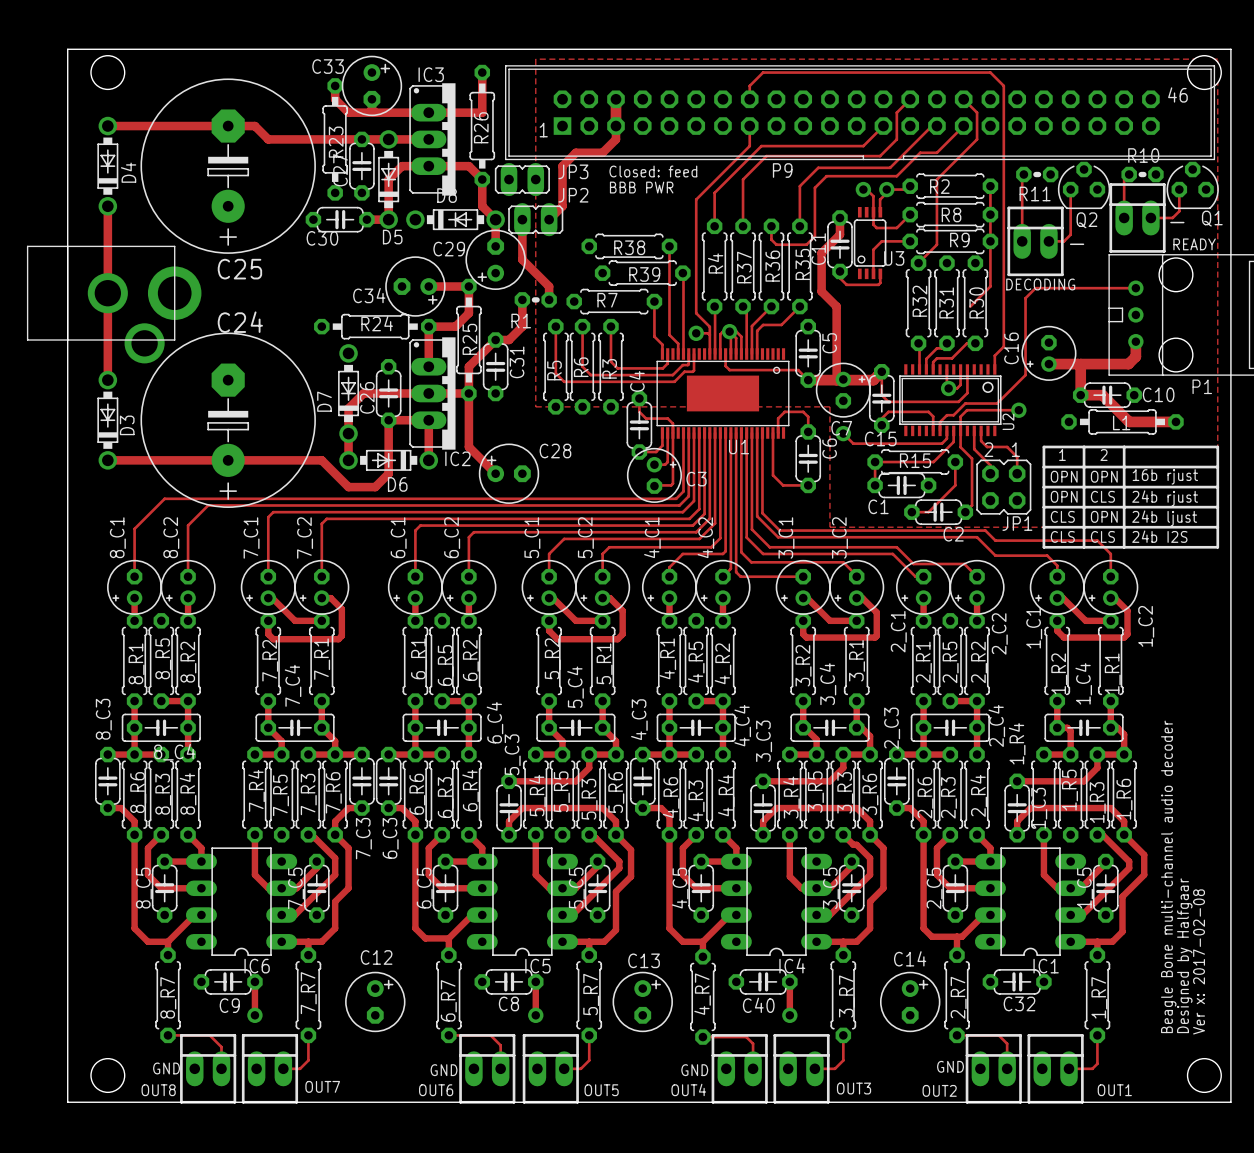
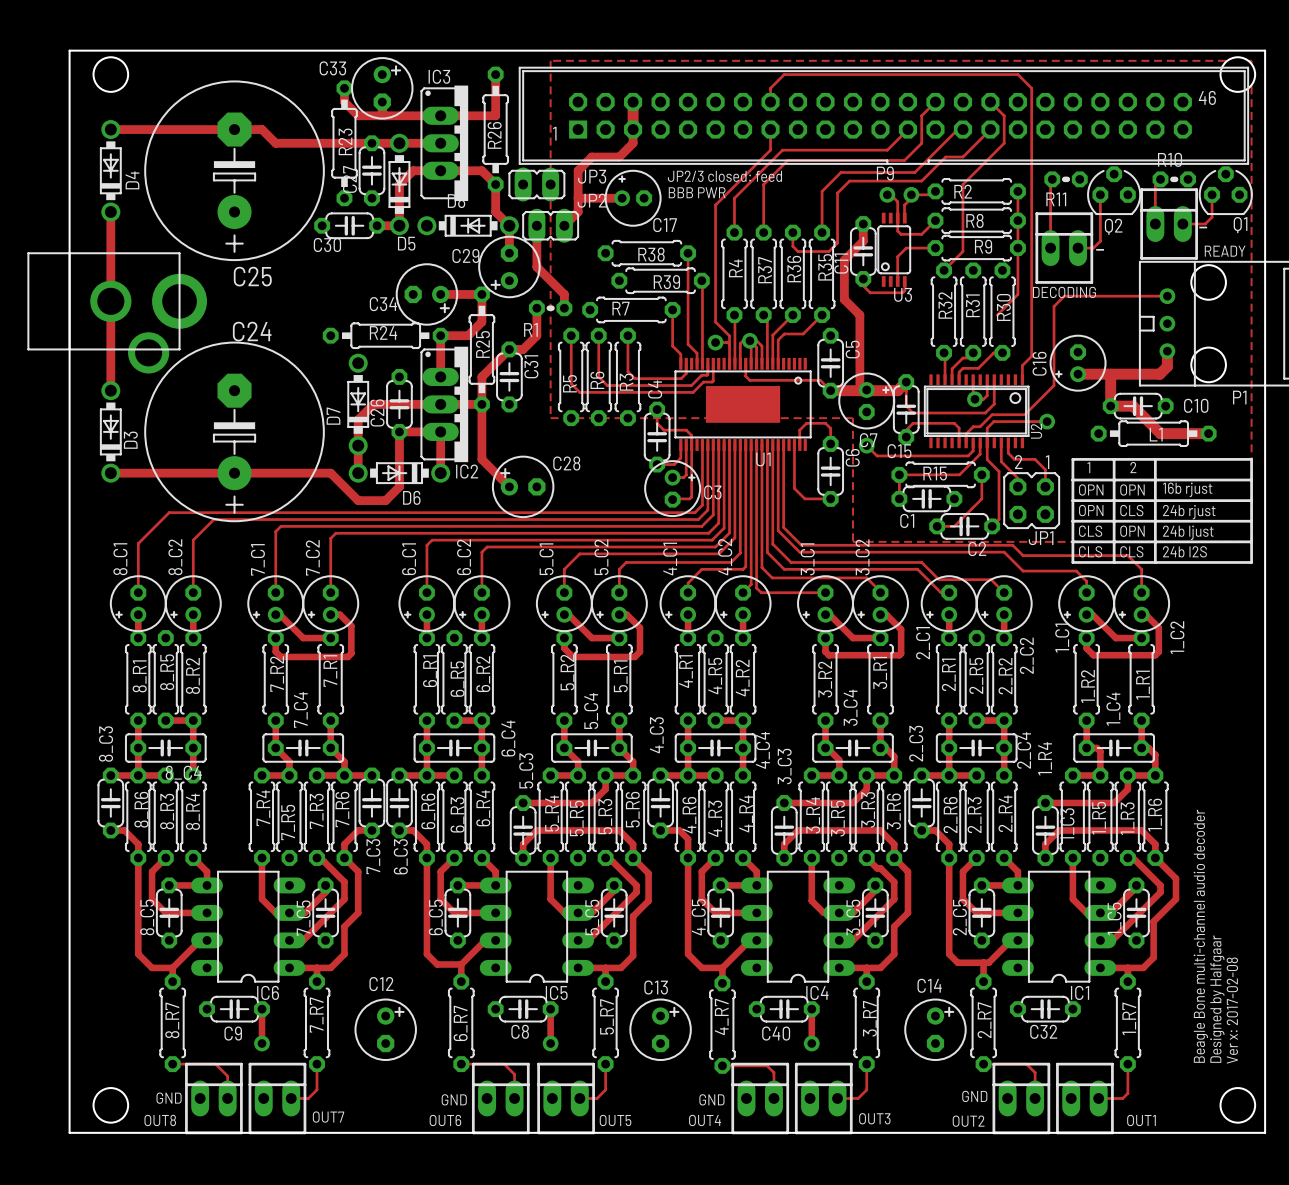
P9 name position: P9 (782, 170) -> P9 (885, 173)
text: Closed: feed (653, 171) -> JP2/3 closed: feed (724, 176)
text position: BBB PWR (641, 187) -> BBB PWR (697, 192)
track: none -> (578, 198) (622, 198)
C17: none -> (633, 198)
U3 name position: U3 (894, 258) -> U3 (903, 294)

